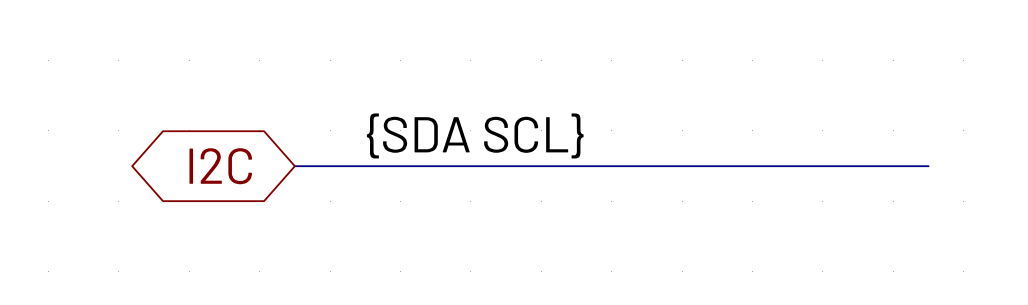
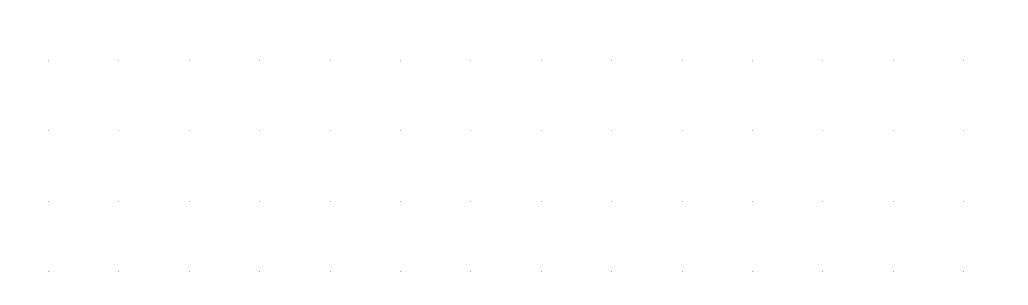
label: {SDA SCL} (475, 135) -> none
global label: I2C (220, 166) -> none
bus: (294, 166) (928, 166) -> none

